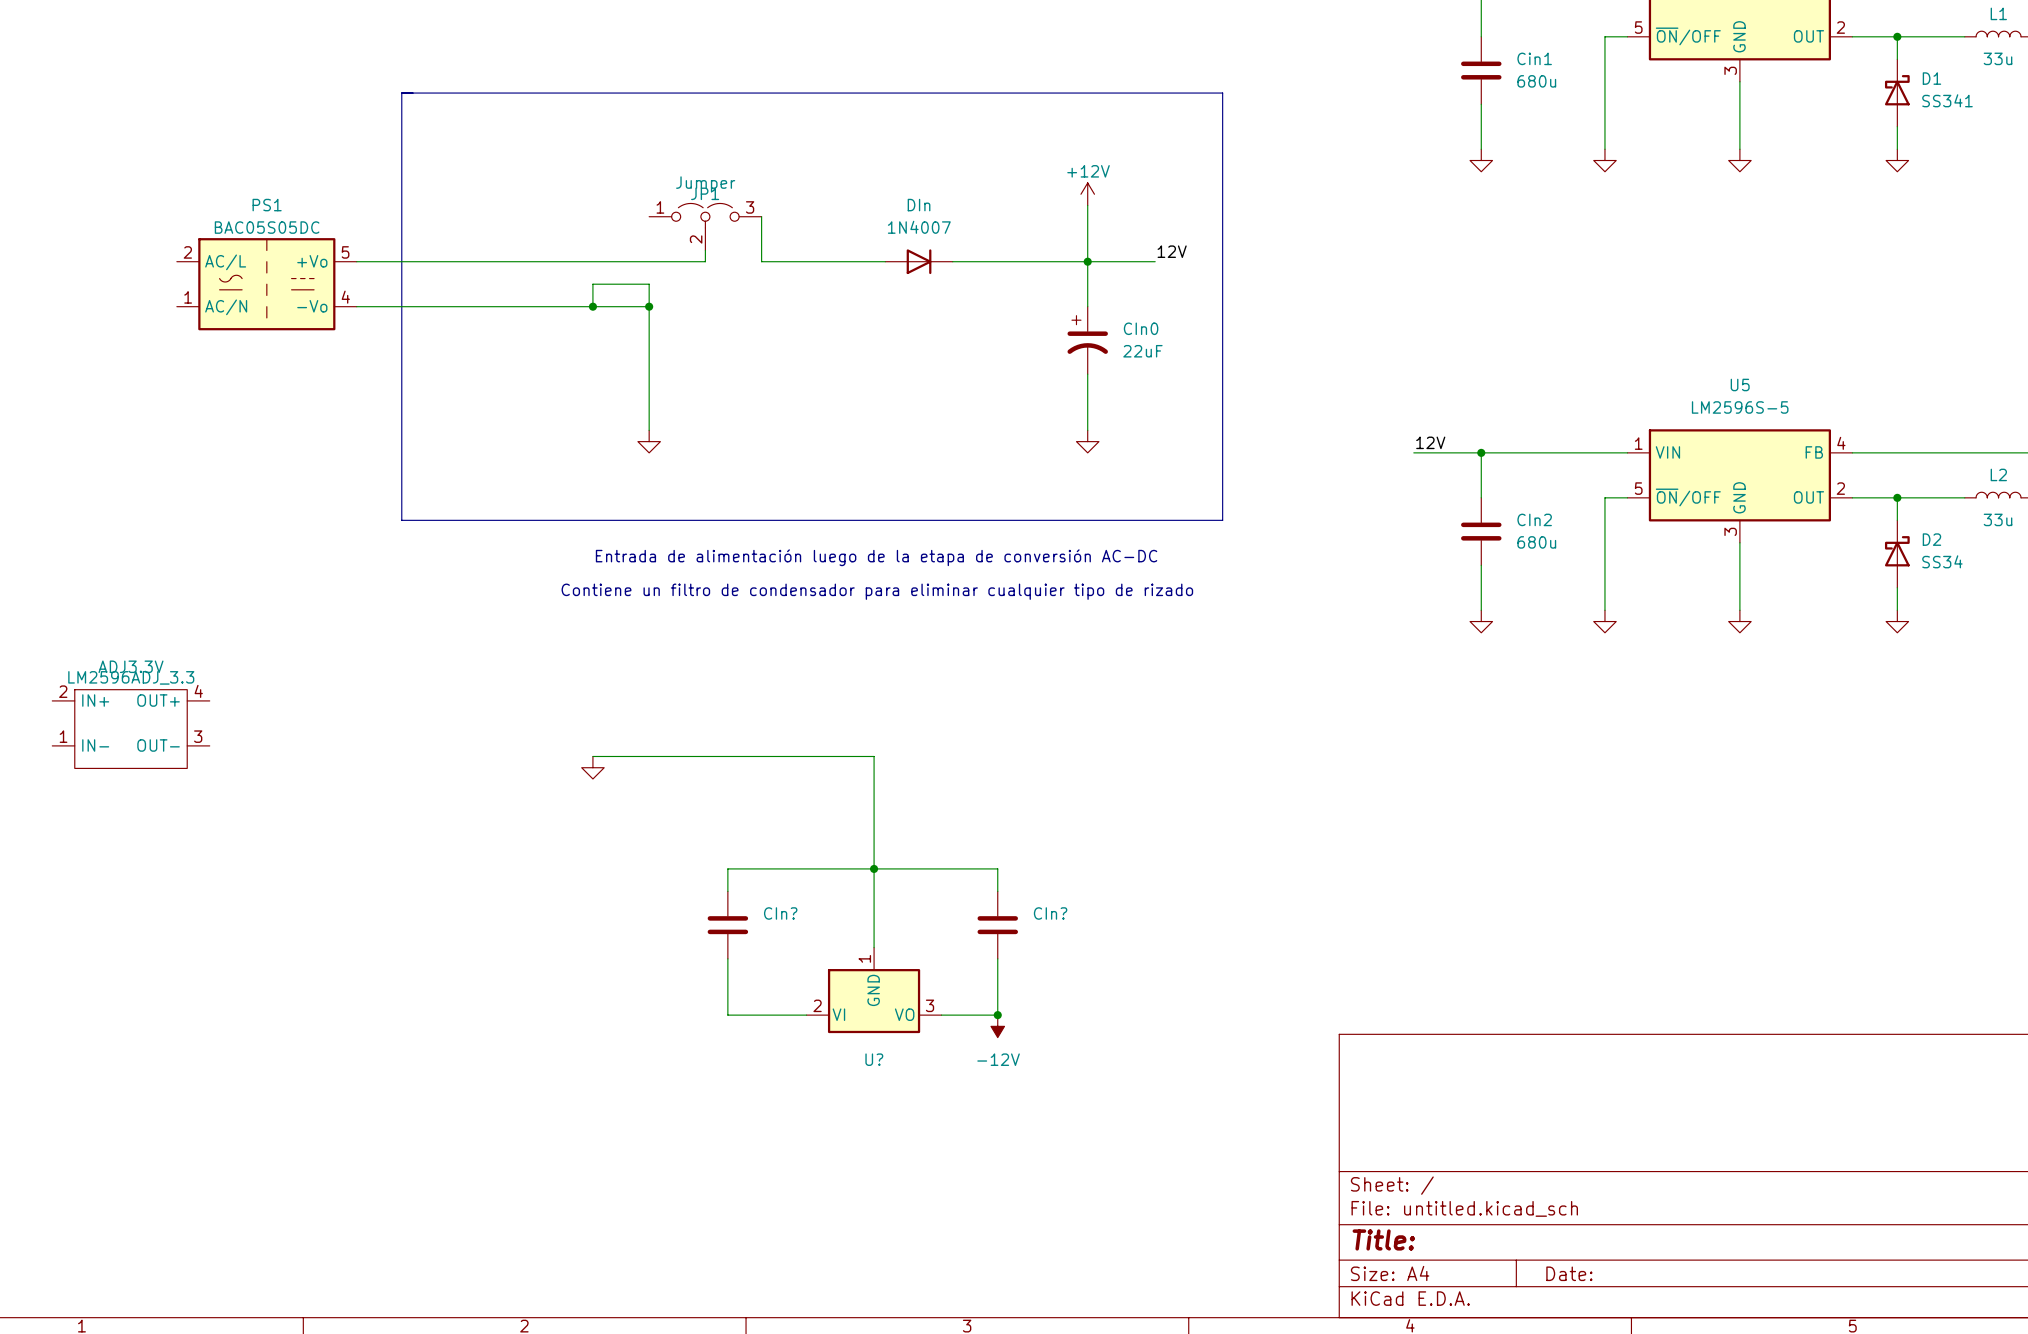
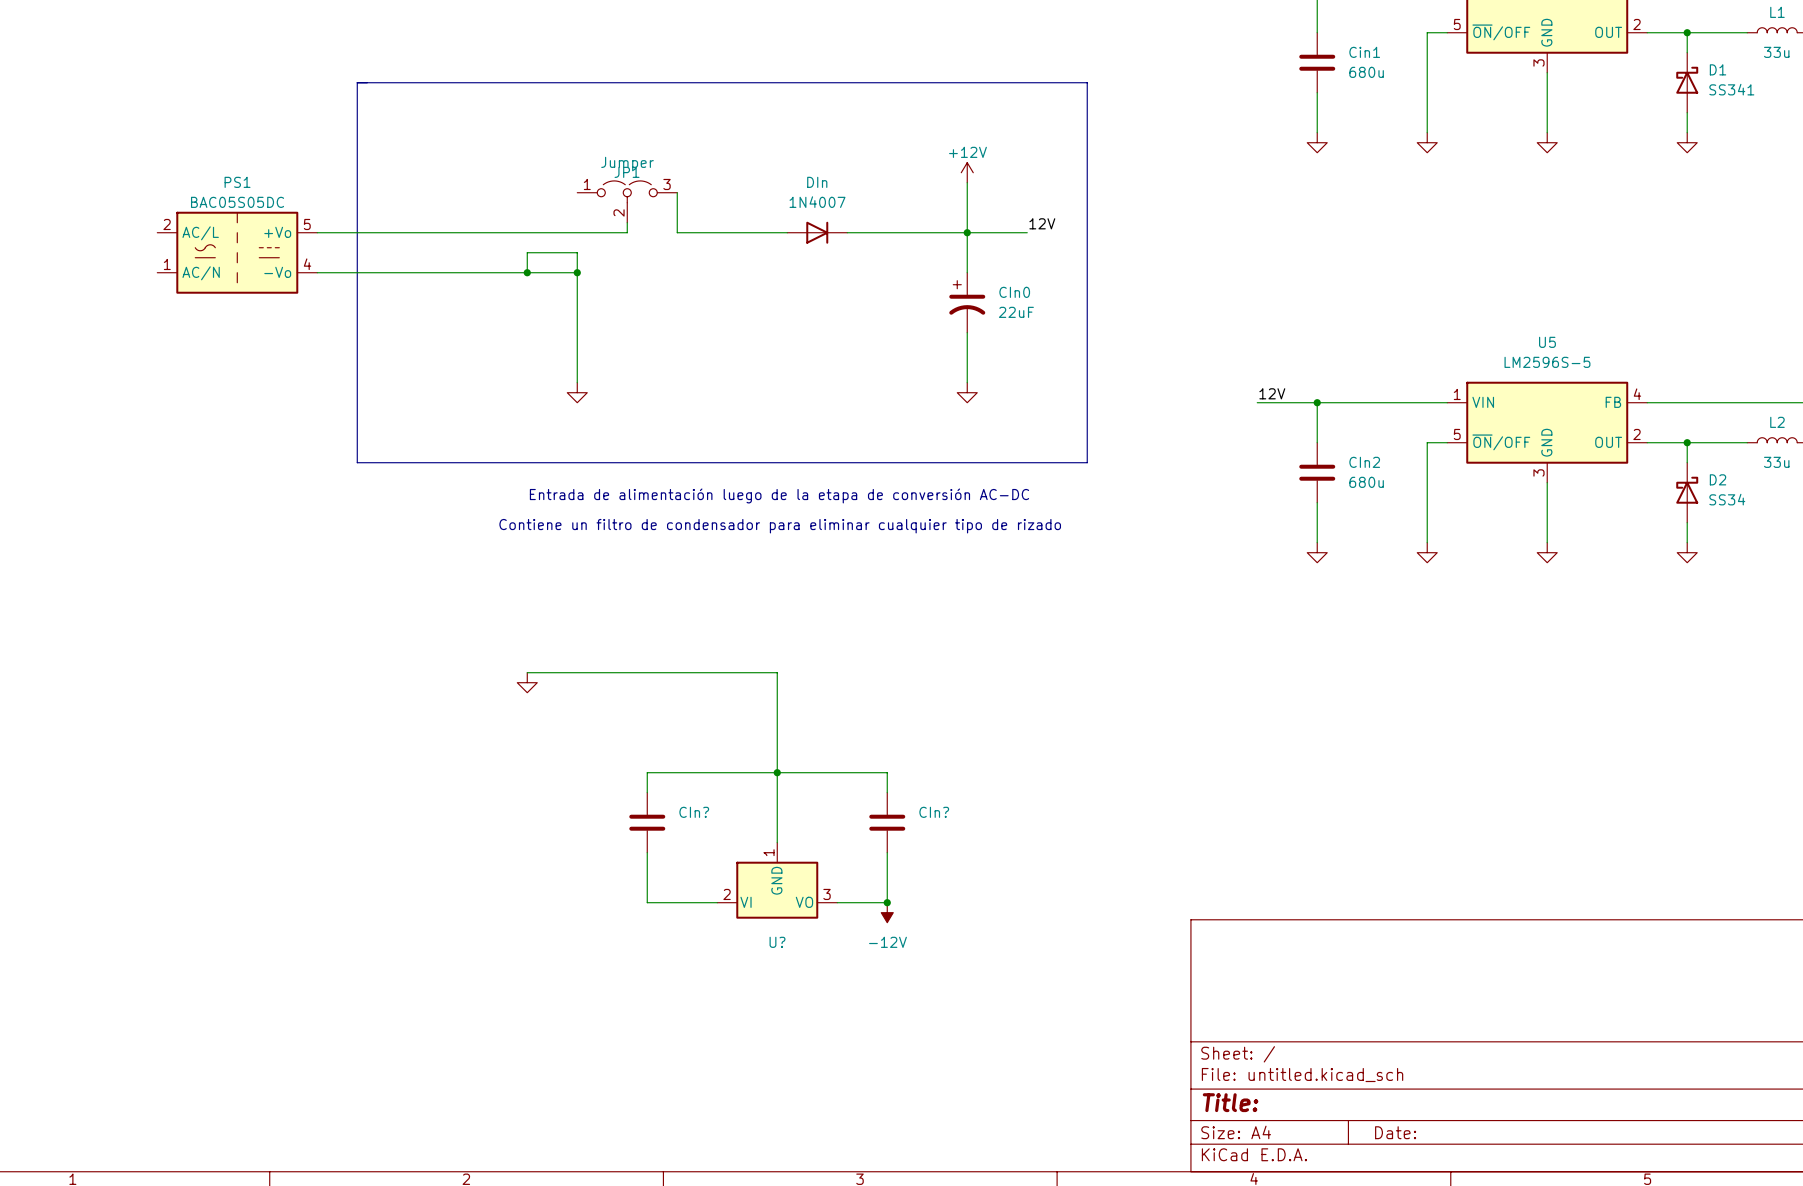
LM2596ADJ_3.3: ADJ3.3V (131, 729) -> none

